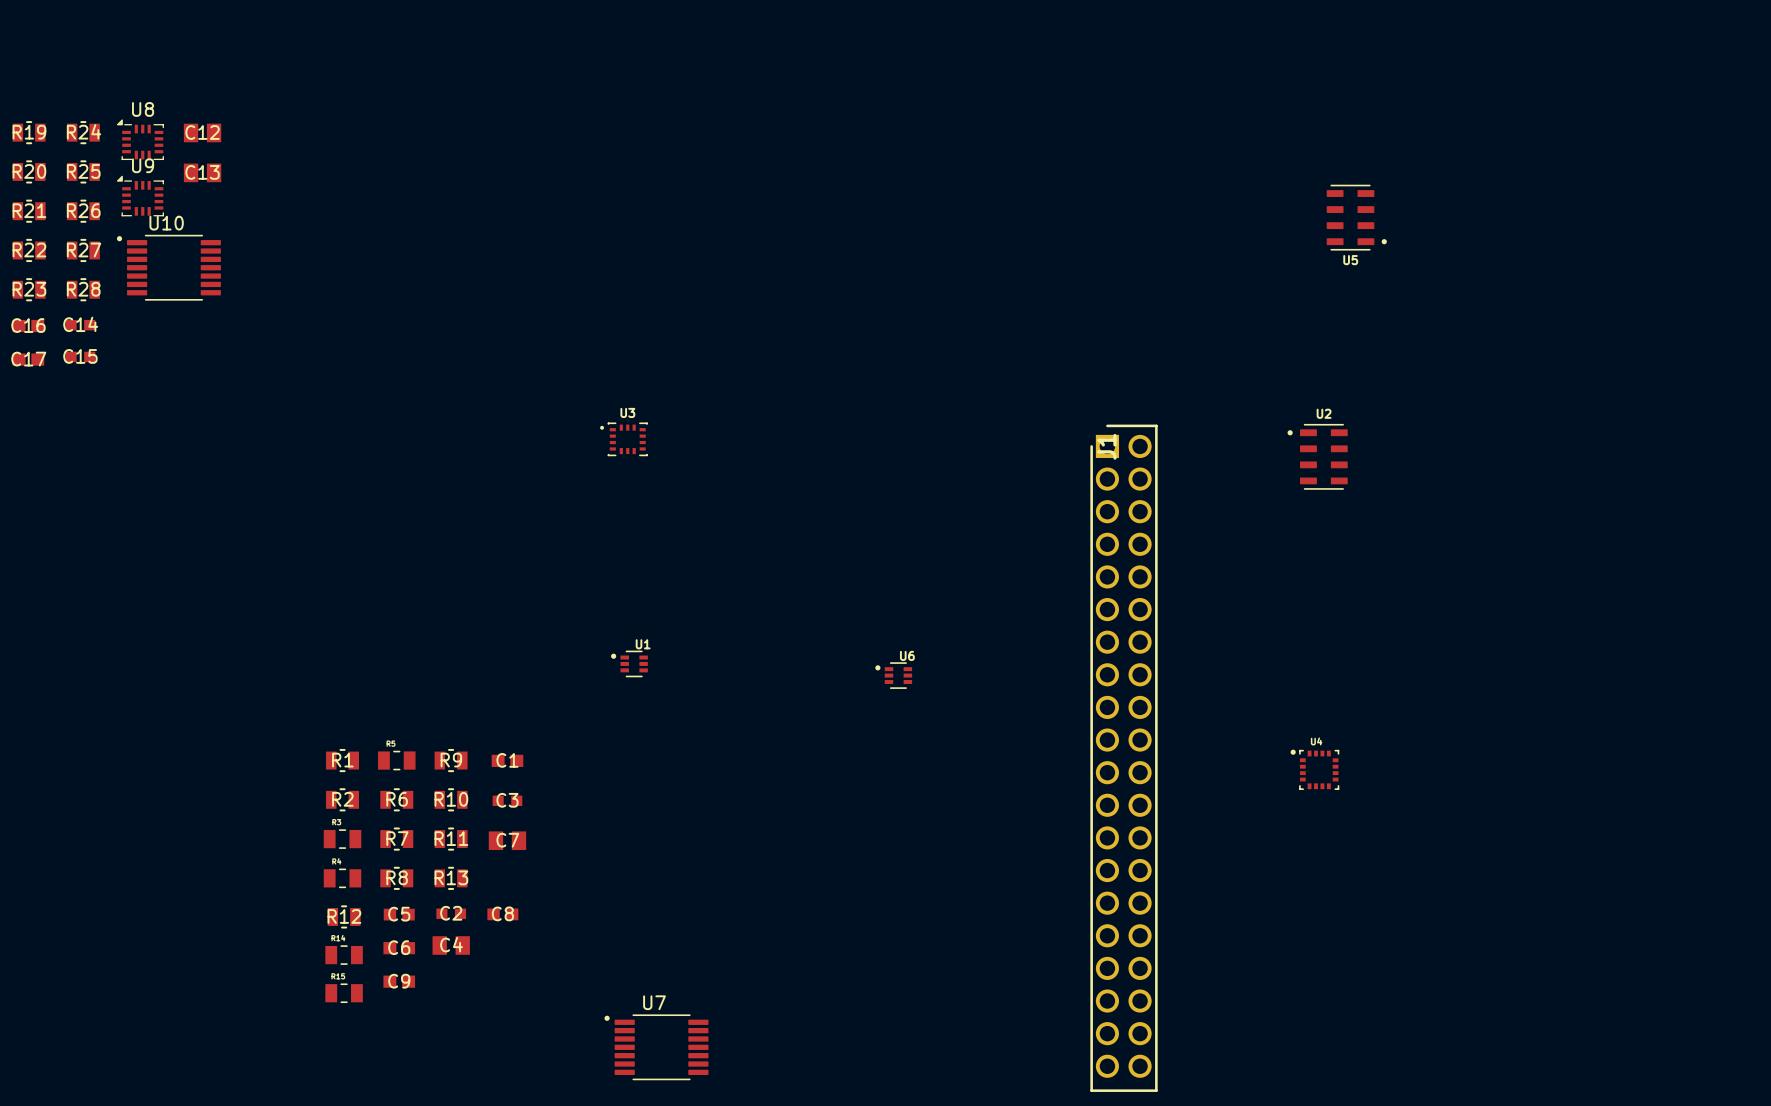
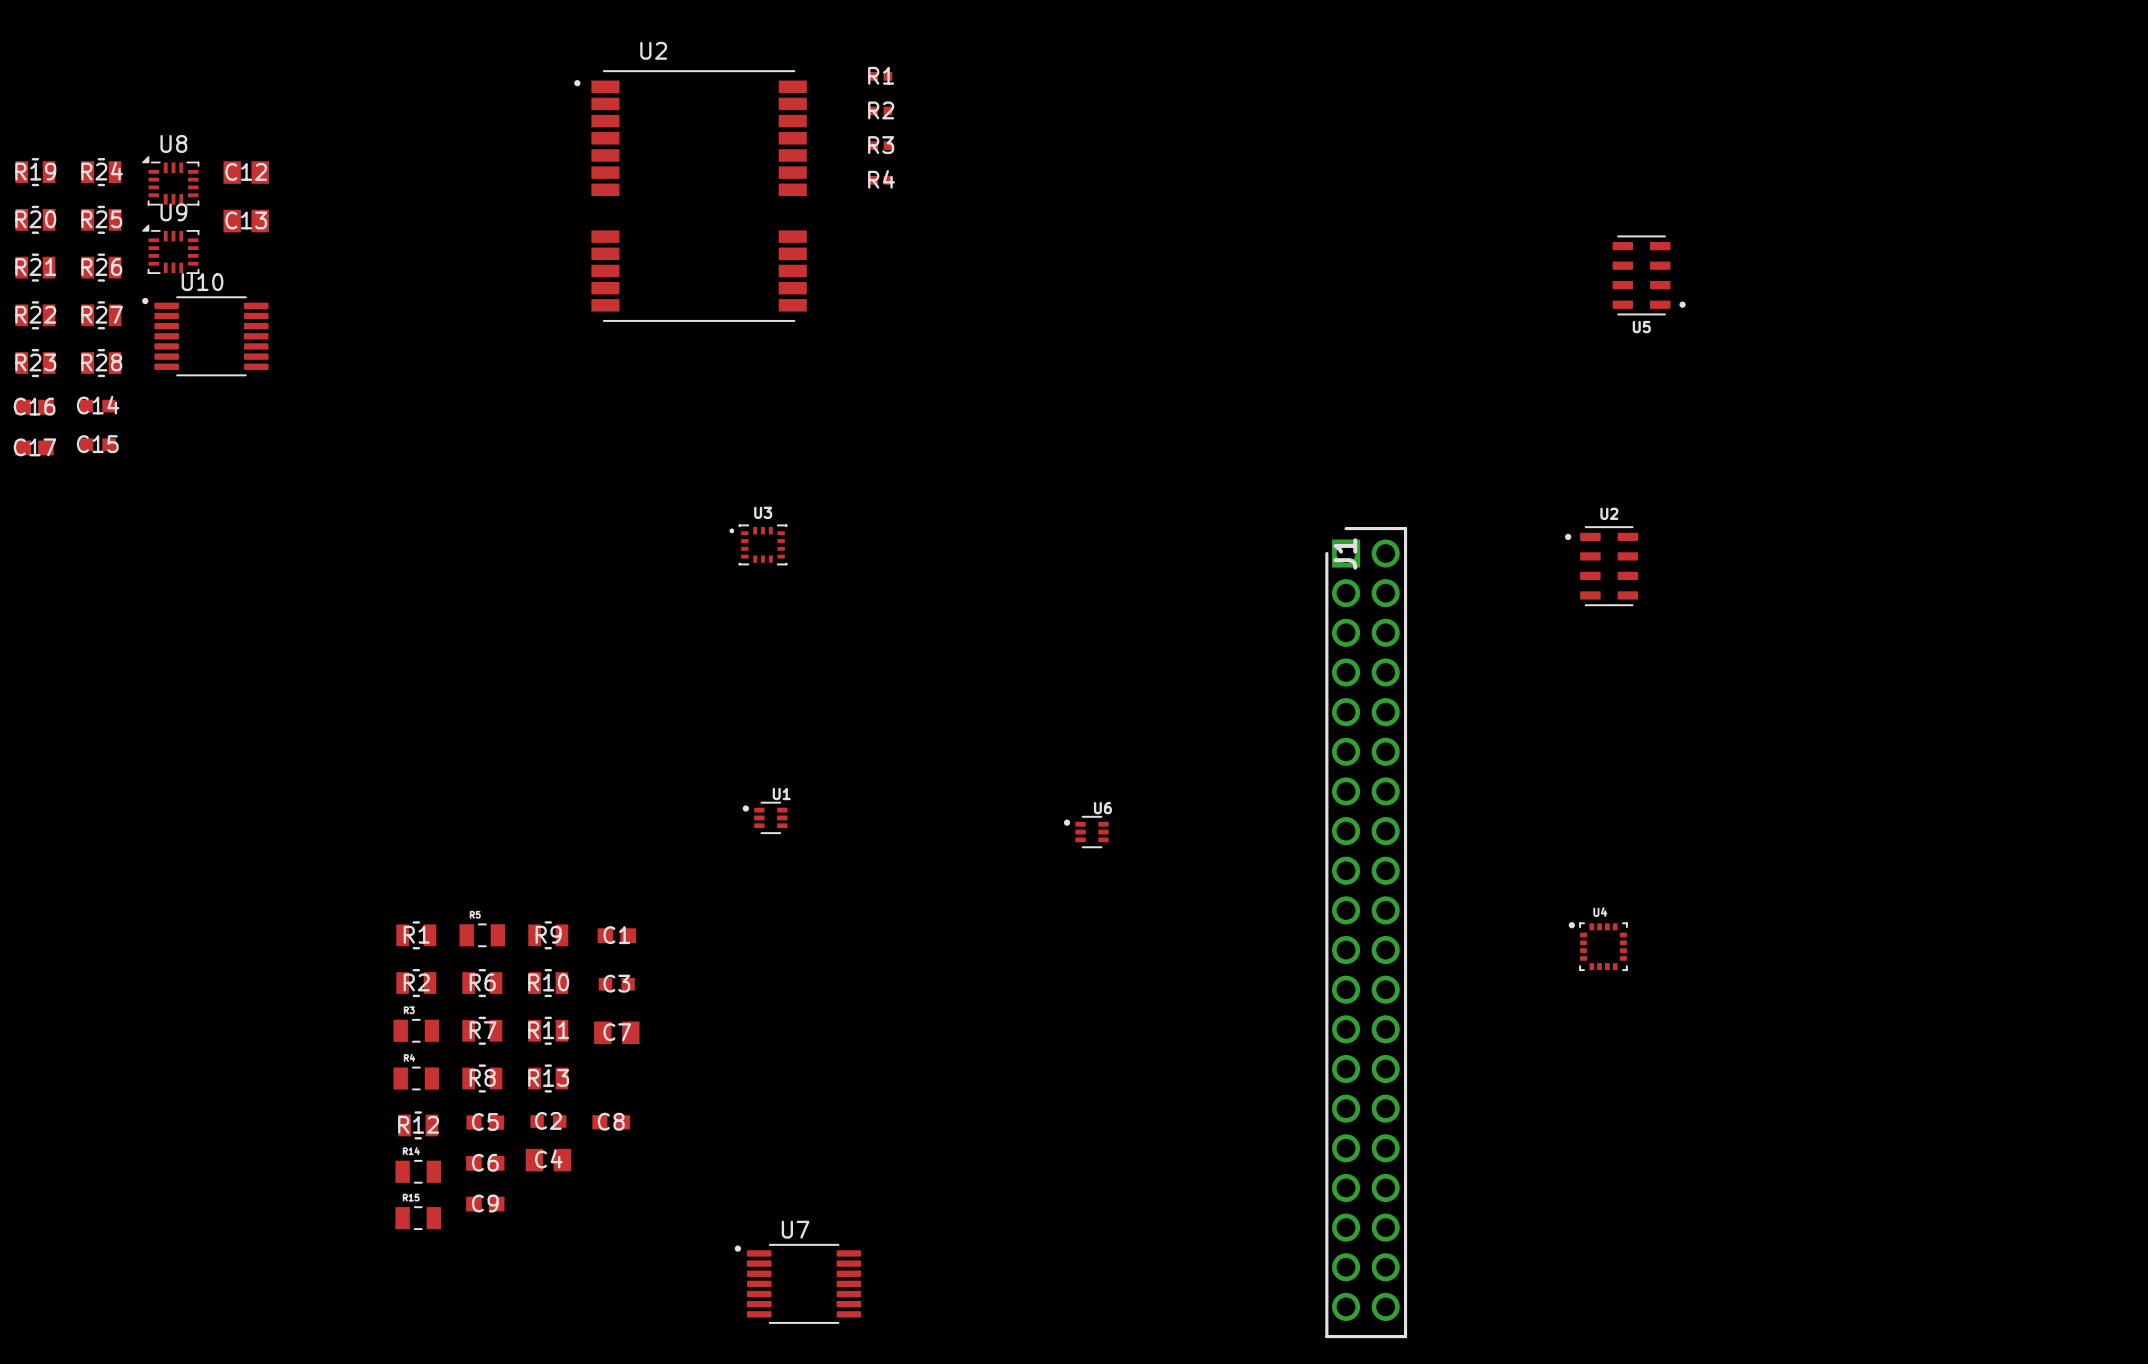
R1: none -> (880, 76)
R2: none -> (880, 111)
R3: none -> (880, 145)
R4: none -> (880, 180)
U2: none -> (690, 196)

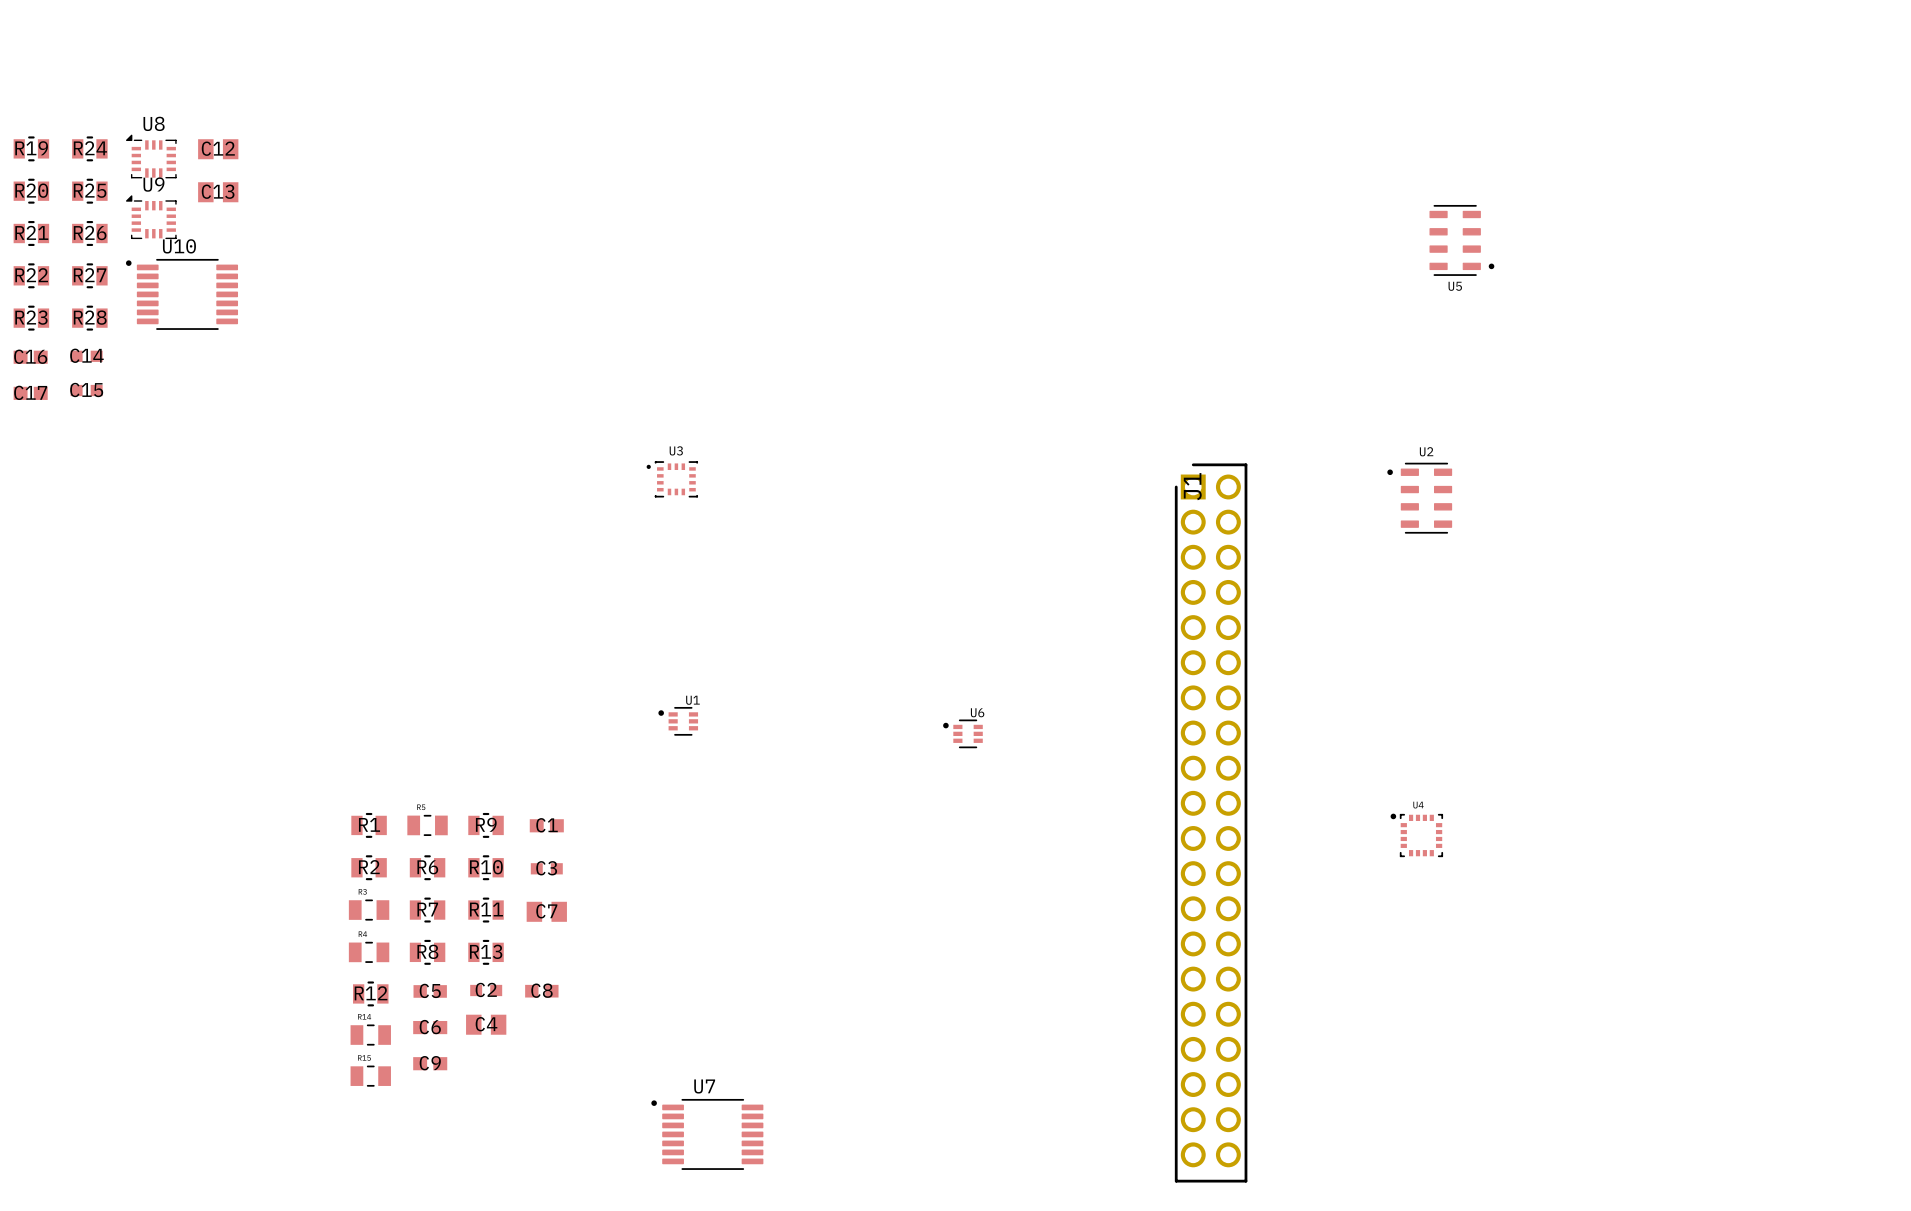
R1: (880, 76) -> none
R2: (880, 111) -> none
R3: (880, 145) -> none
R4: (880, 180) -> none
U2: (690, 196) -> none

